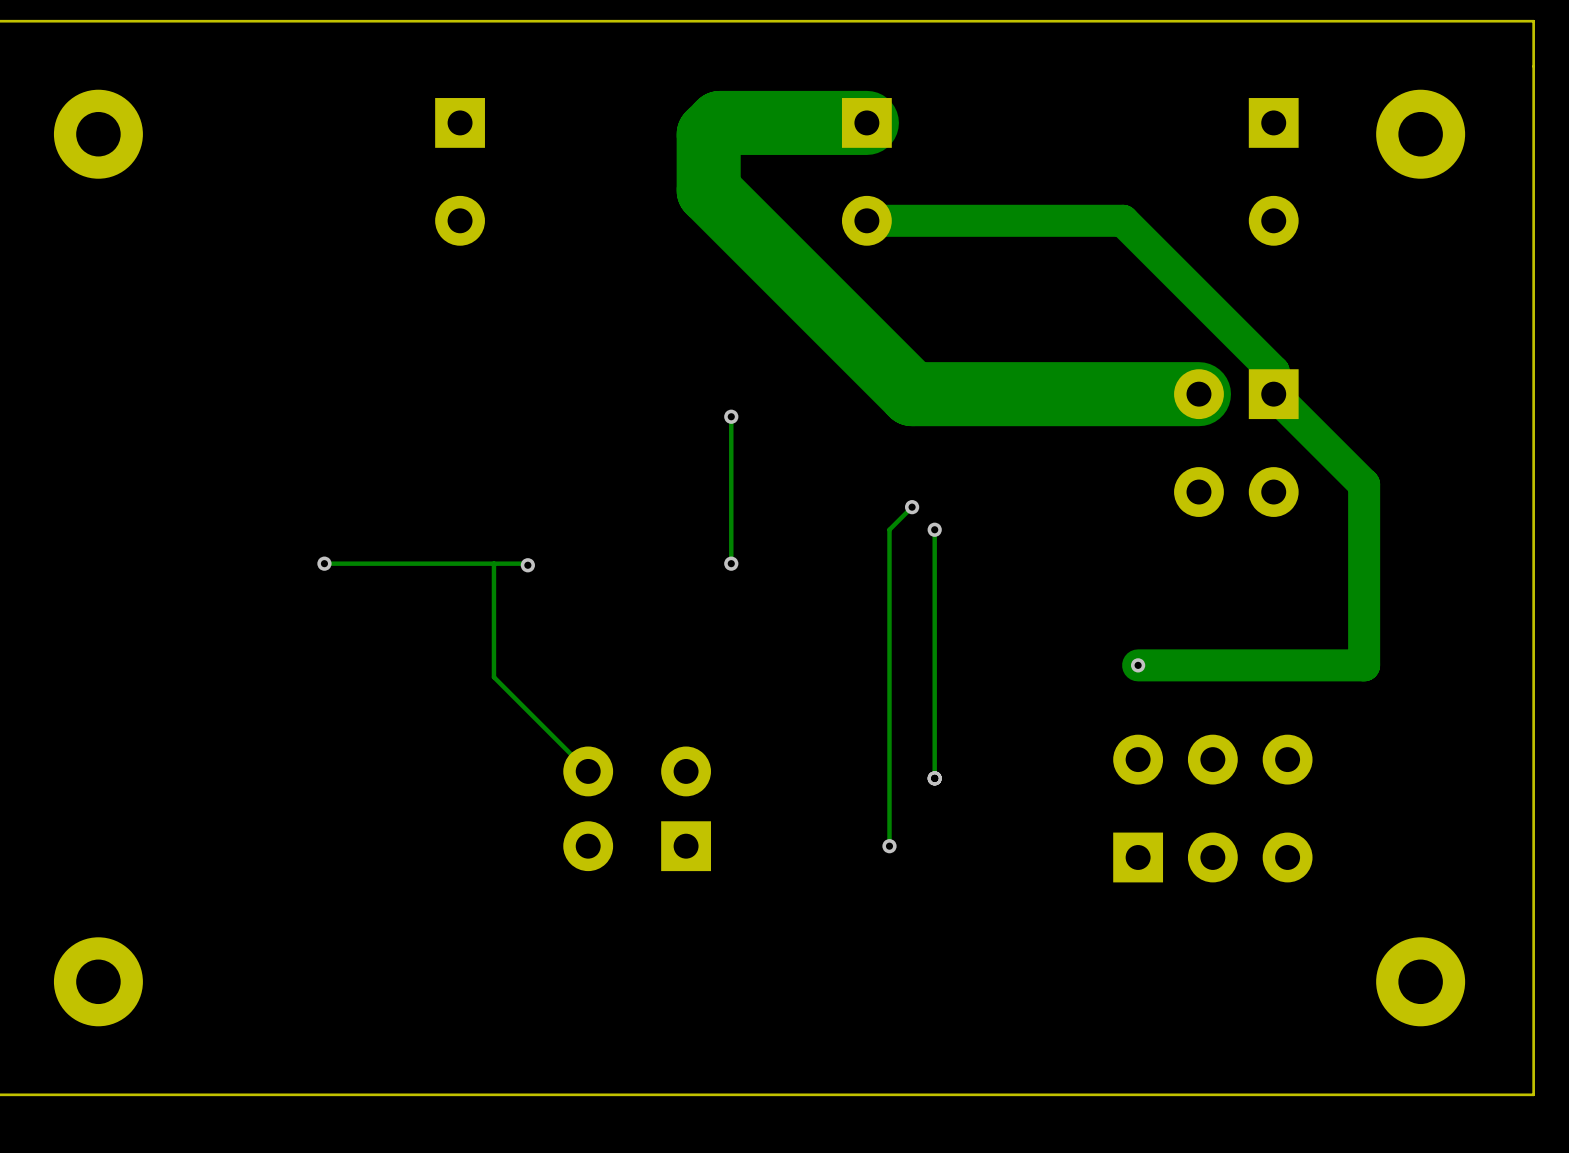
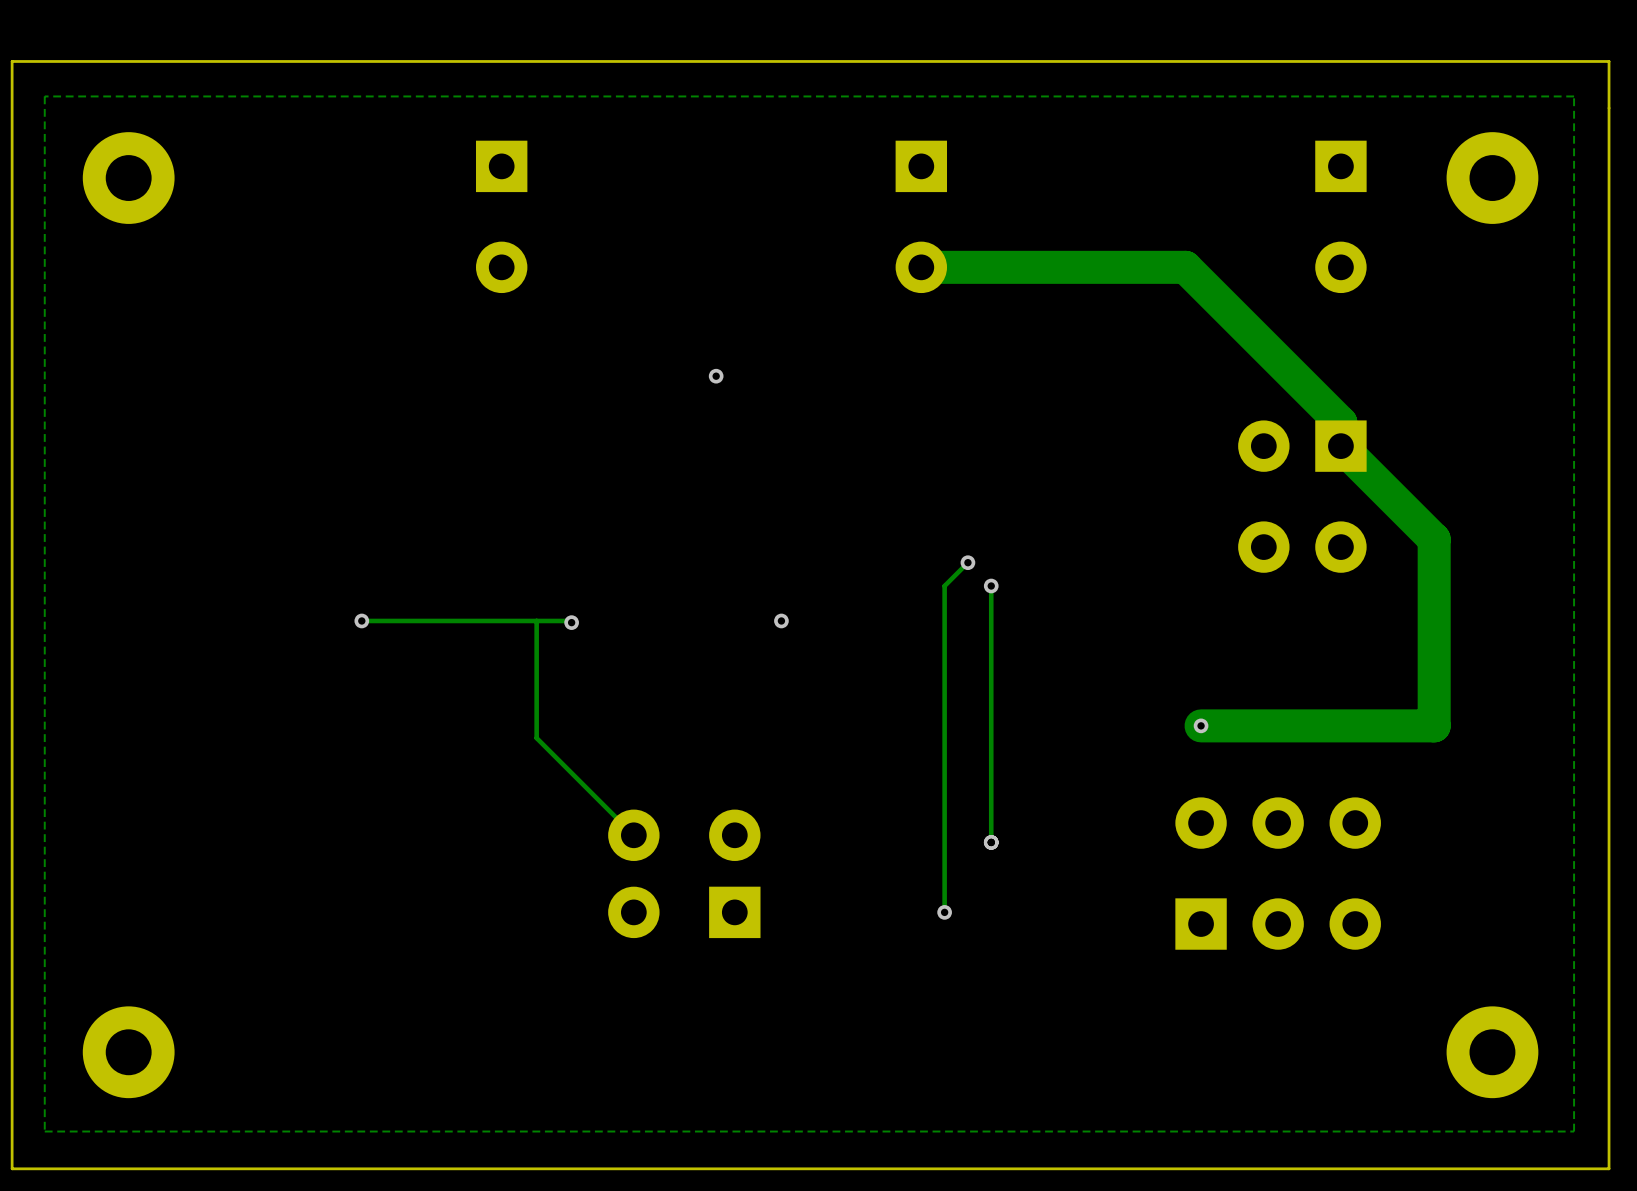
zone outline: none -> (1574, 96) (1574, 1131) (44, 1131) (44, 96) (1574, 96)
track: (866, 122) (719, 122) (708, 134) (708, 190) (912, 394) (1198, 394) -> none
via: none -> (716, 376)
track: (731, 416) (731, 563) -> none
via: (731, 416) -> none

